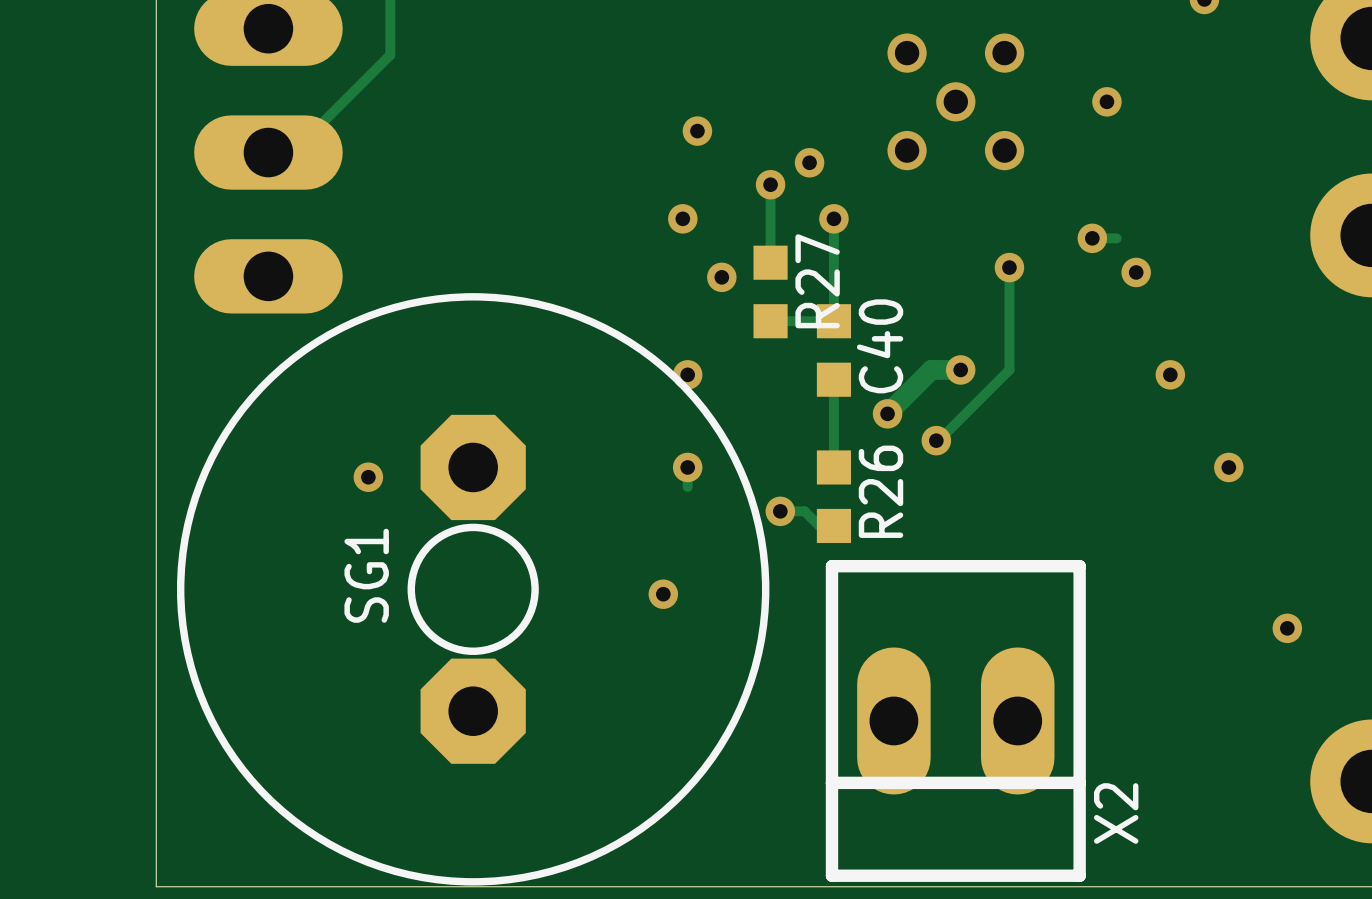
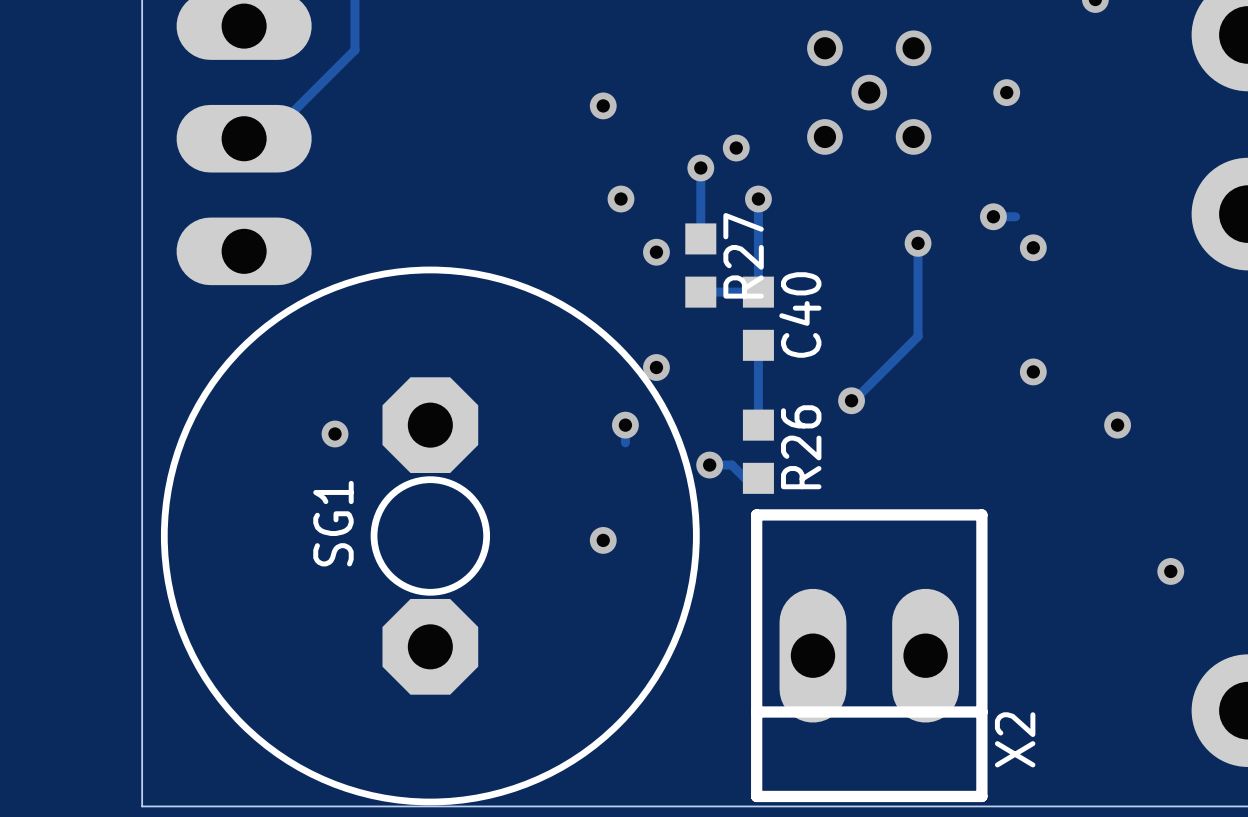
via position: (697, 131) -> (603, 105)
track: (960, 369) (931, 369) (887, 413) -> none
via: (960, 369) -> none
via position: (687, 374) -> (656, 367)
via position: (1170, 374) -> (1033, 371)
via: (887, 413) -> none

